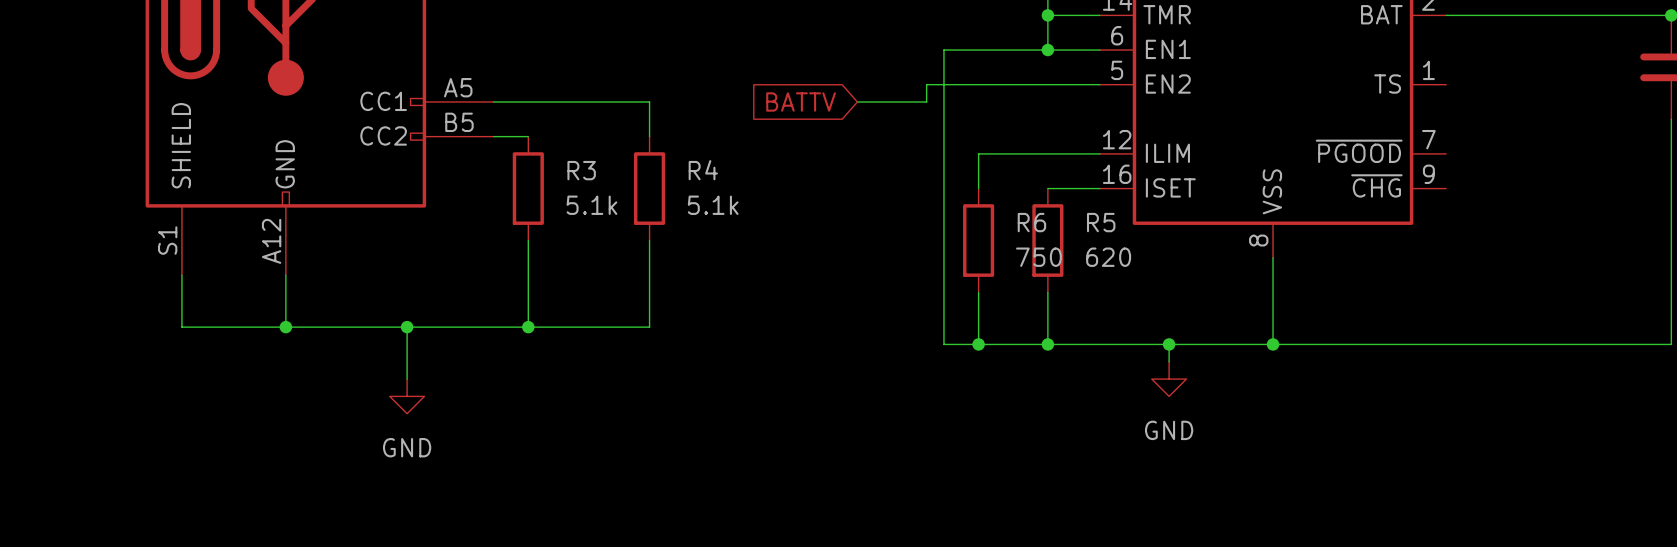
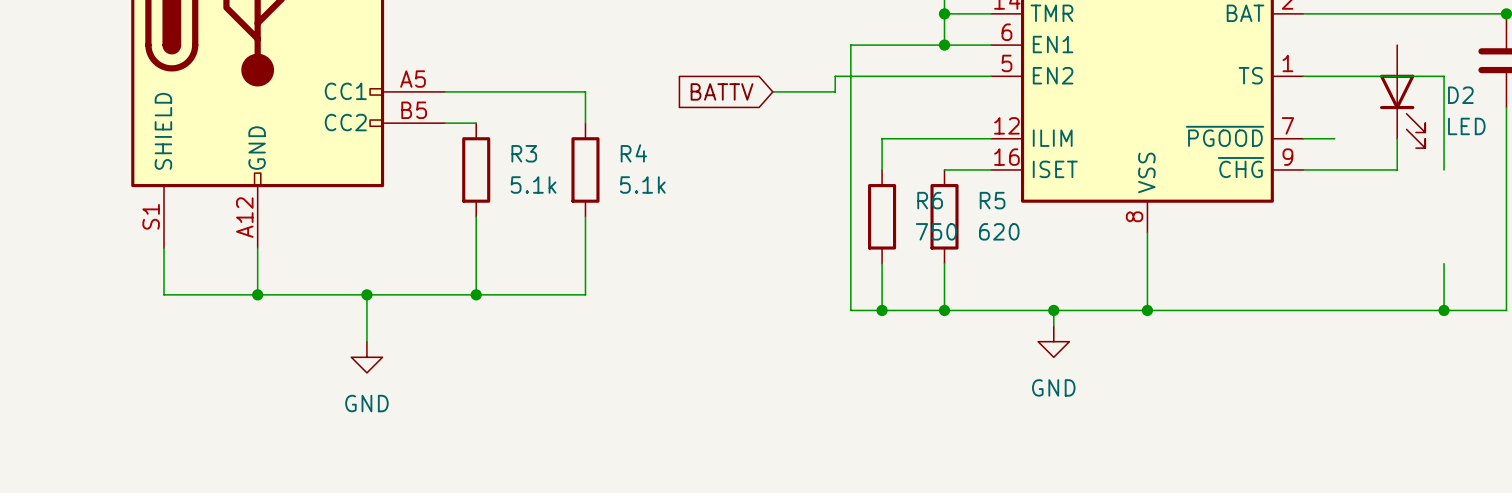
wire: none -> (1303, 76) (1444, 76) (1444, 169)
D2: none -> LED (1402, 96)
wire: none -> (1303, 138) (1334, 138)
wire: none -> (1397, 138) (1397, 169) (1303, 169)
wire: none -> (1444, 263) (1444, 310)
junction: none -> (1444, 310)

